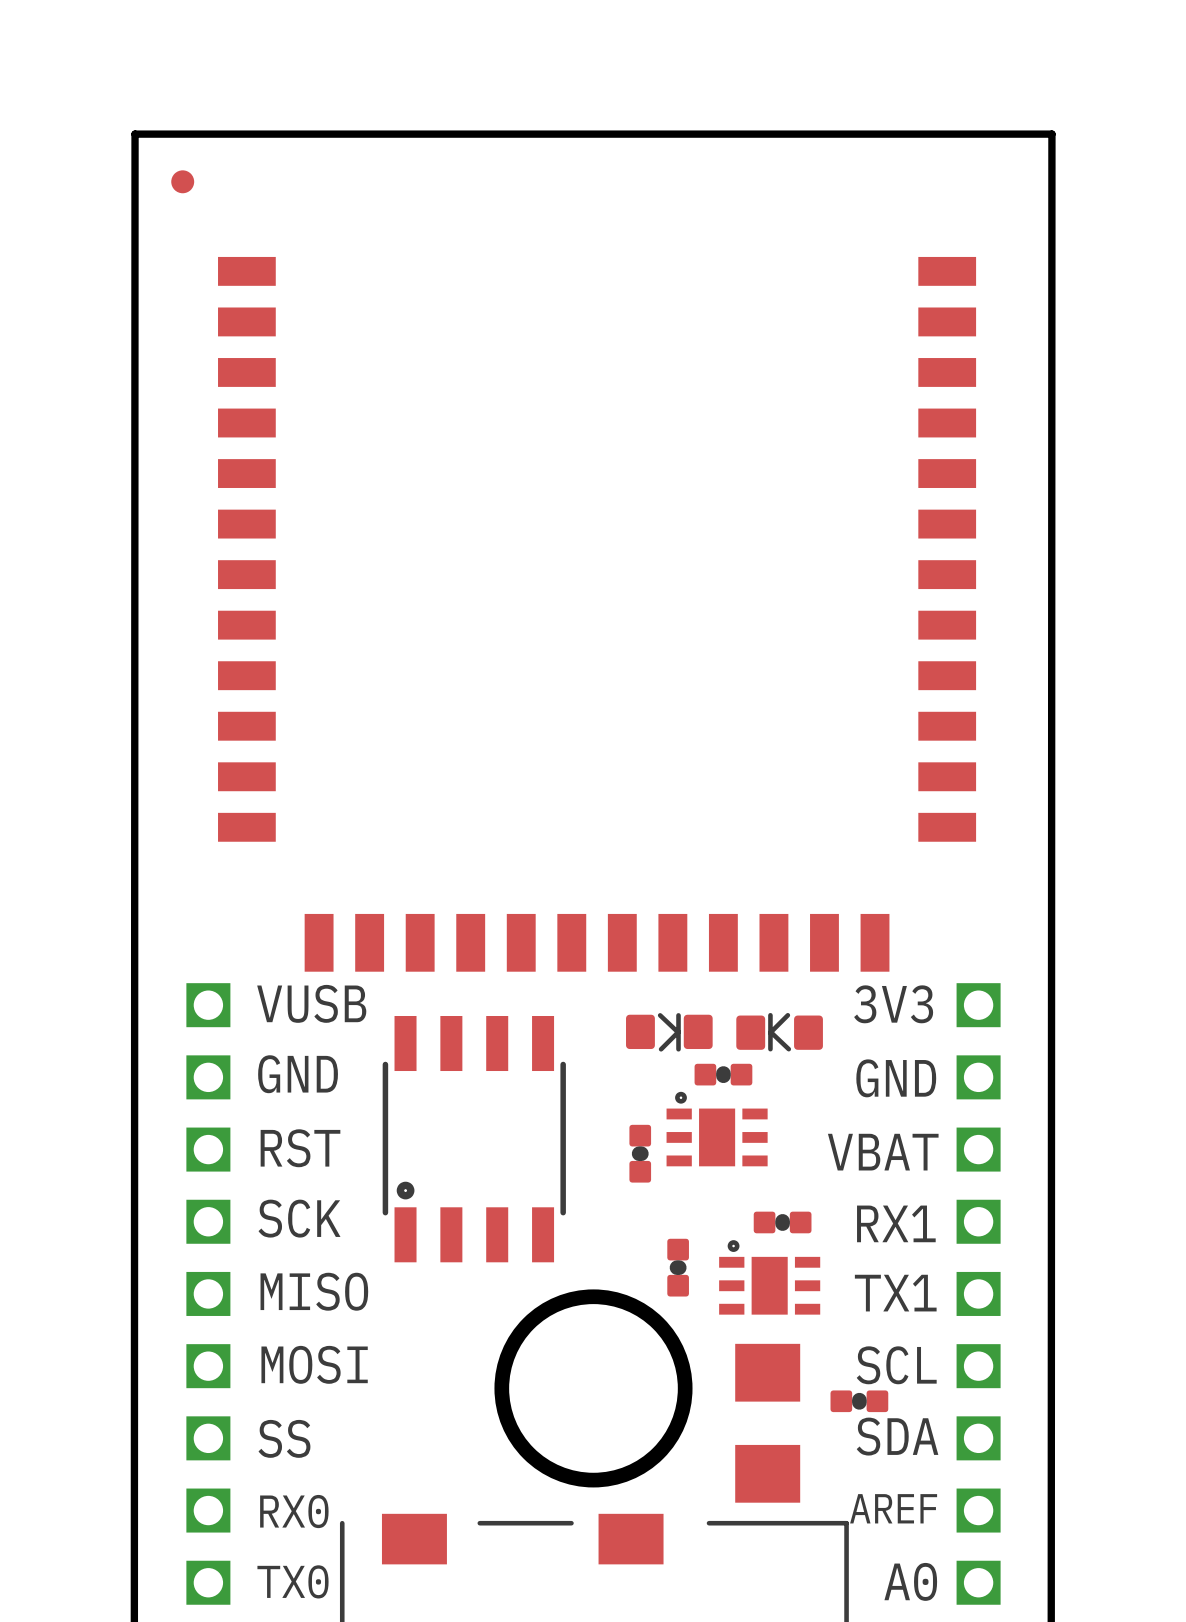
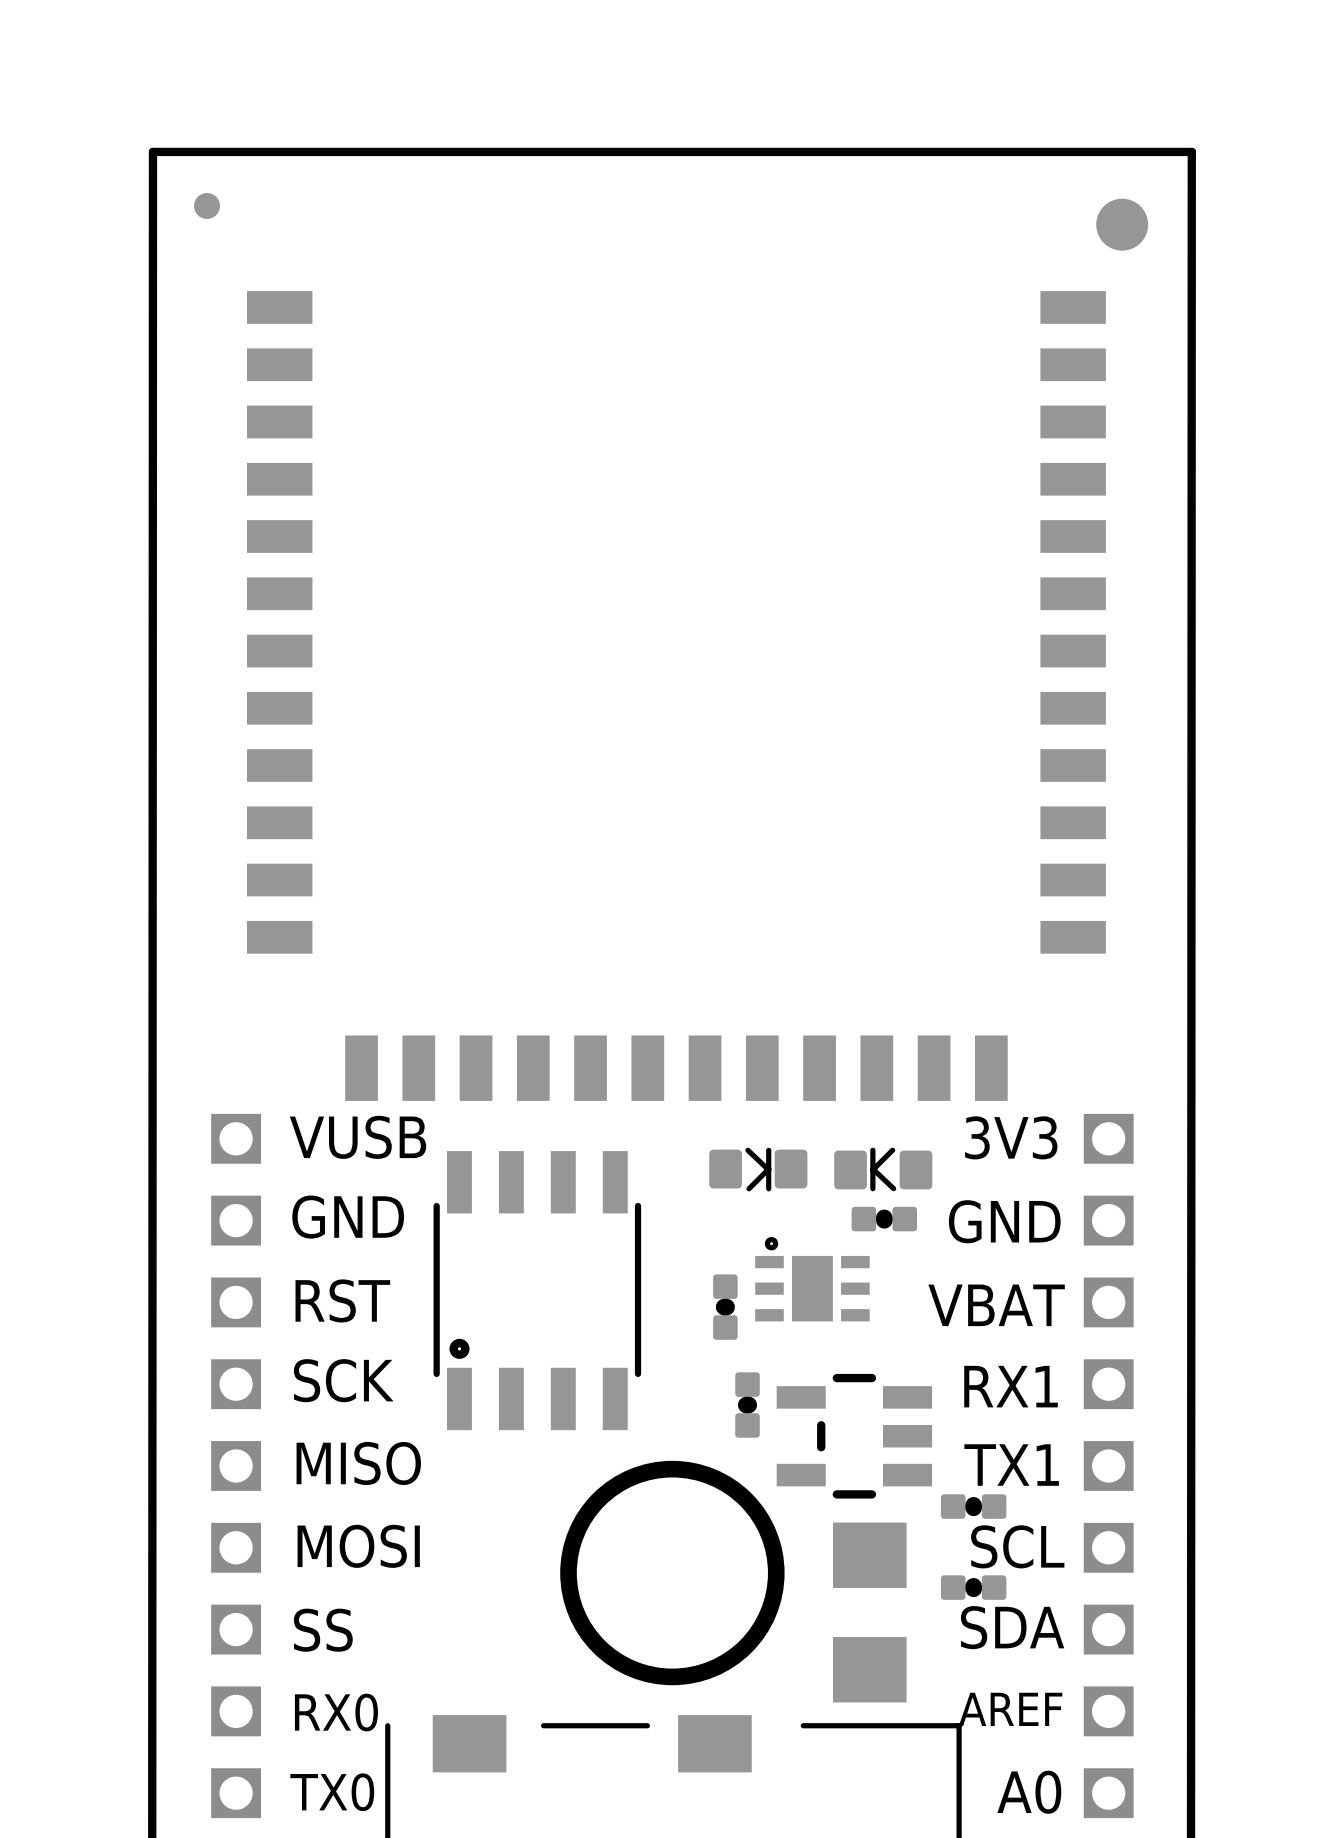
part: none -> (1122, 224)
part position: (723, 1074) -> (884, 1219)
part: (782, 1222) -> none
part footprint: [719, 1240, 821, 1315] -> [776, 1373, 933, 1499]
part position: (678, 1267) -> (747, 1405)
part: none -> (973, 1506)

